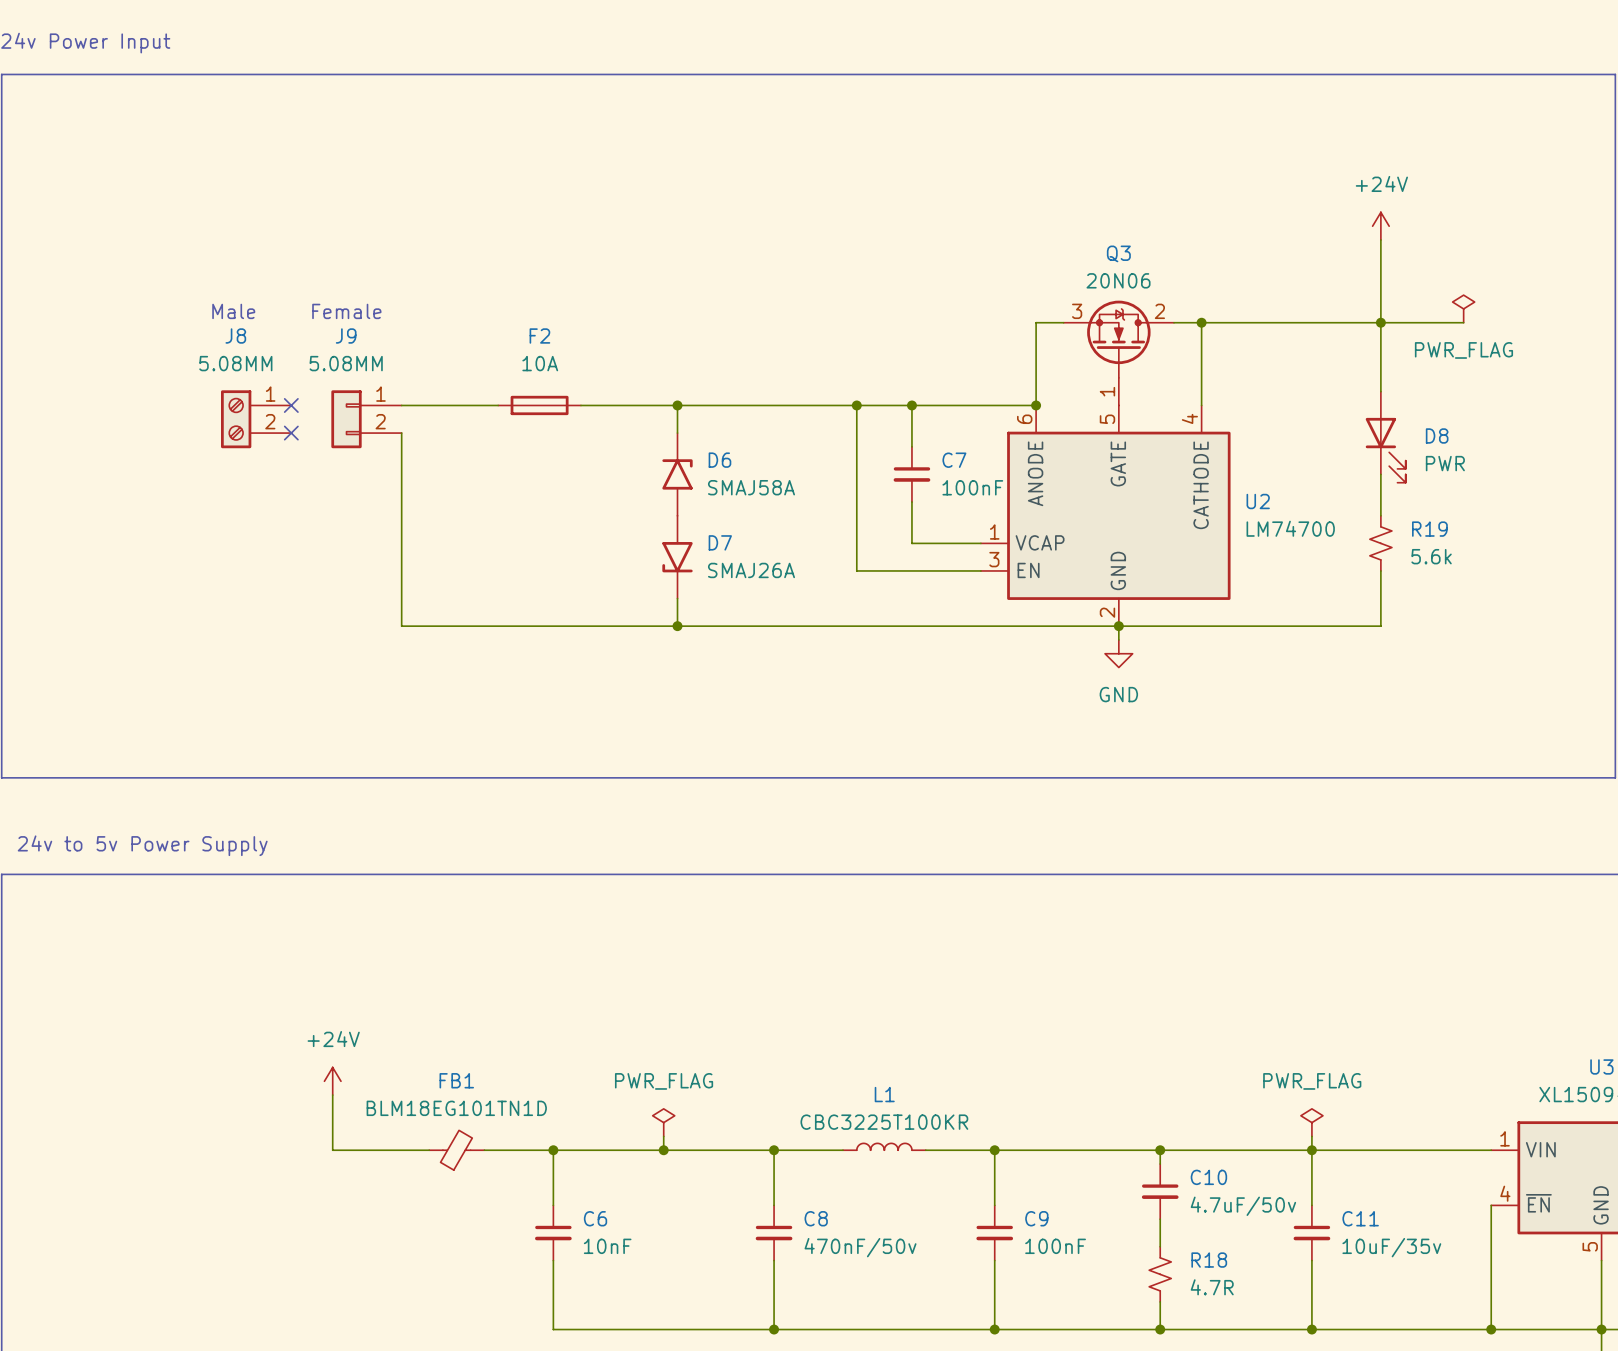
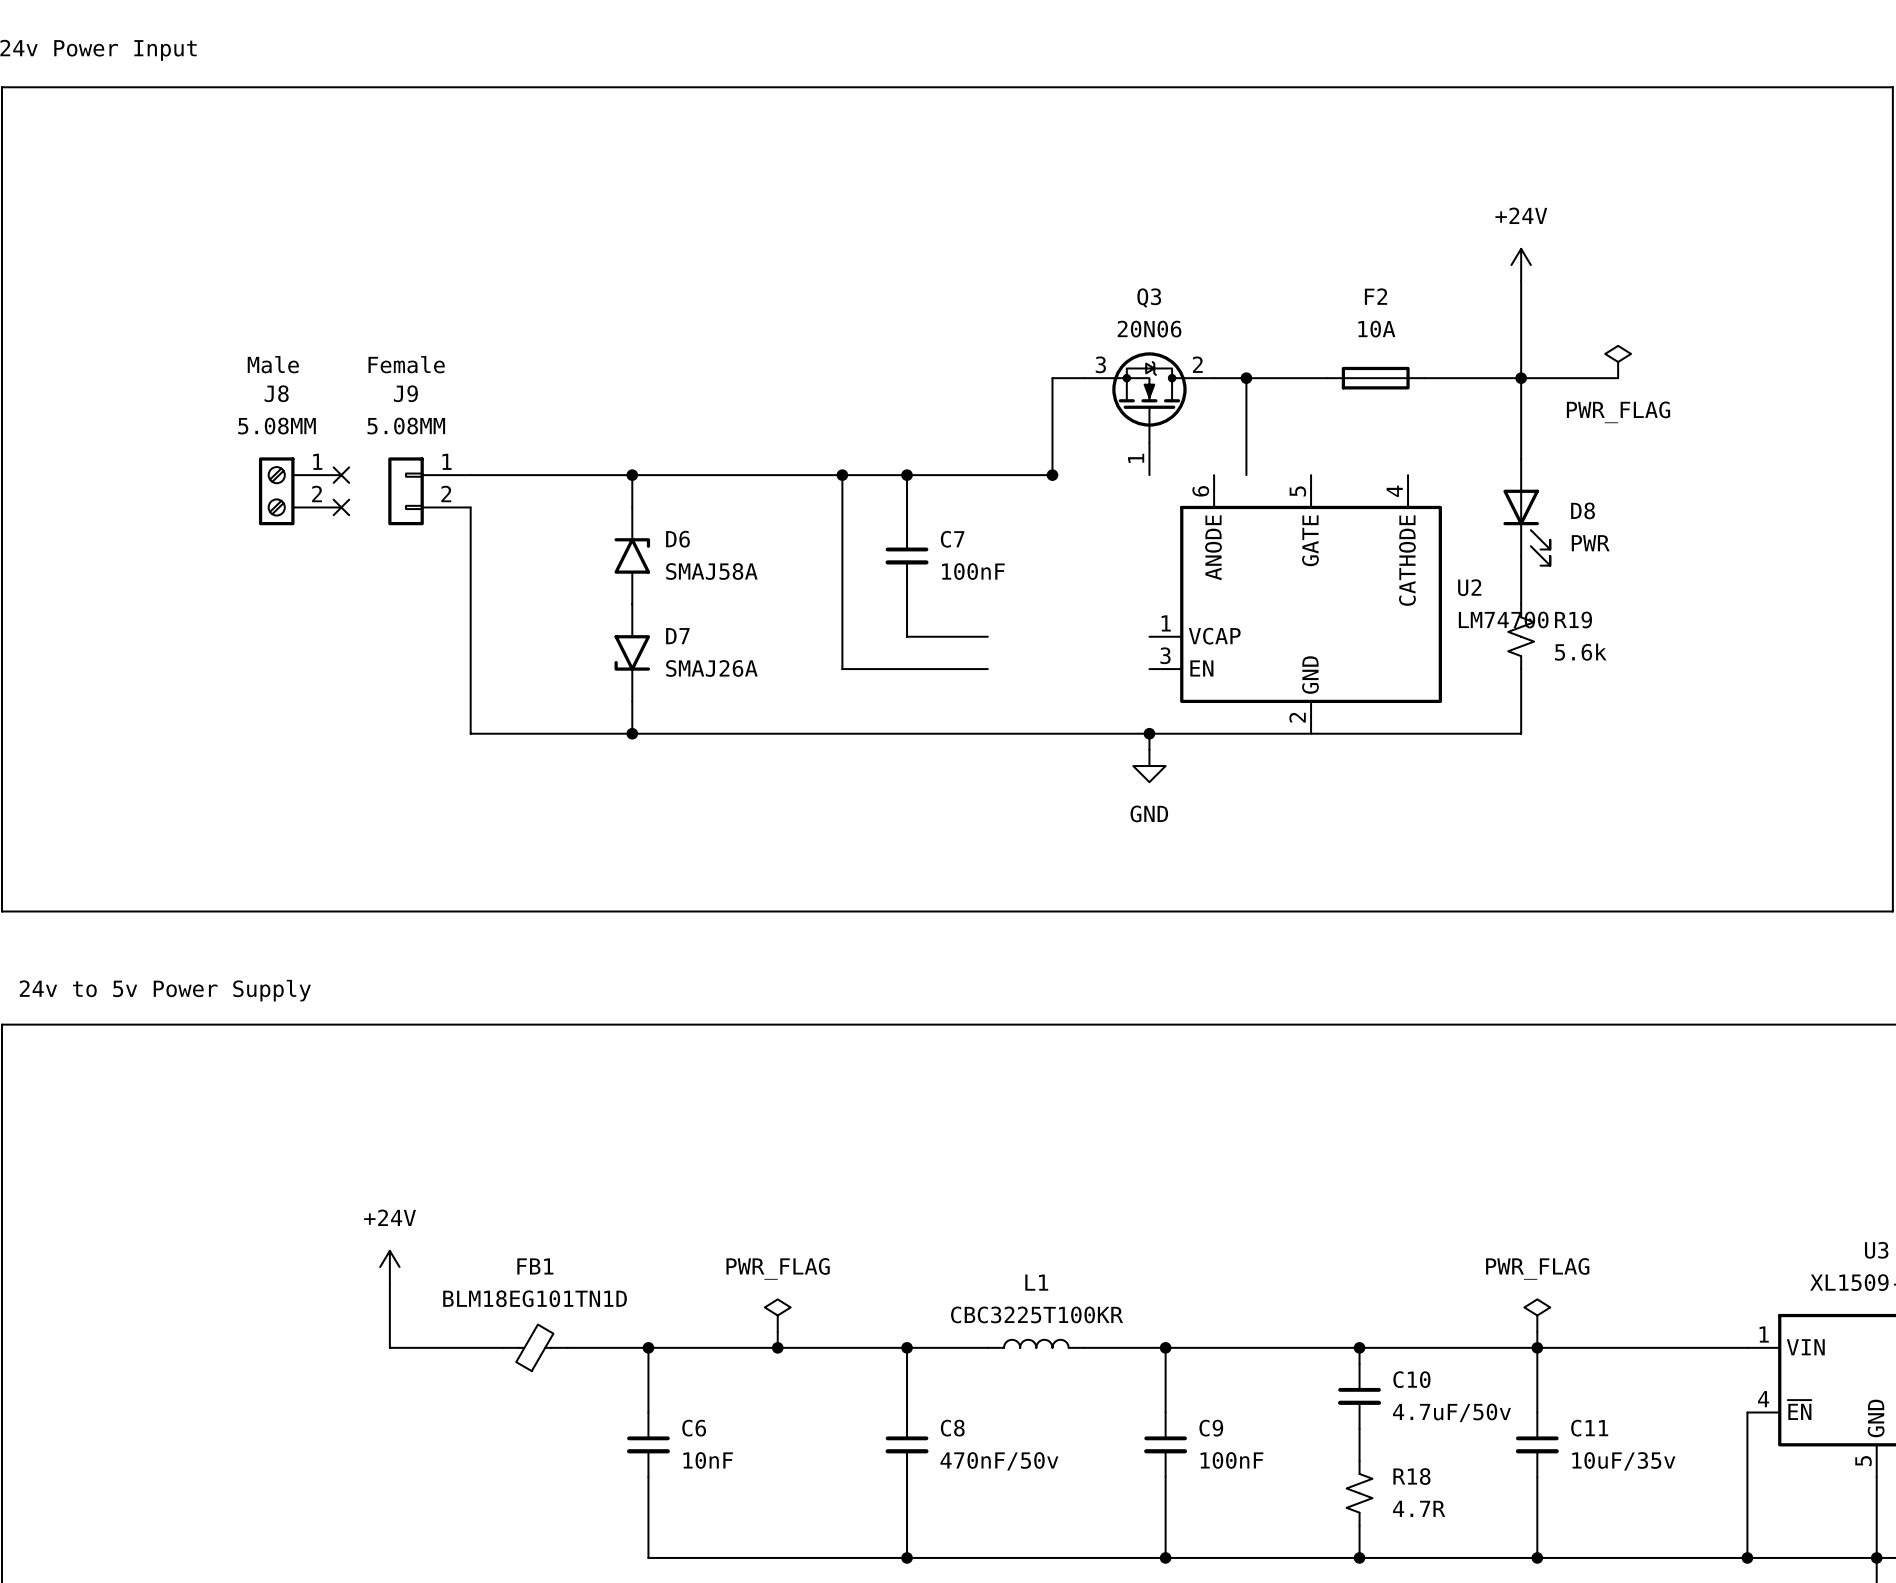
power symbol position: +24V (1380, 226) -> +24V (1521, 265)
wire: (1380, 239) (1380, 391) -> (1521, 281) (1521, 458)
power symbol position: PWR_FLAG (1463, 308) -> PWR_FLAG (1618, 362)
wire: (1036, 322) (1036, 405) (898, 405) -> (1084, 378) (1052, 378) (1052, 475)
junction: none -> (1246, 378)
wire: none -> (1327, 378) (1246, 378) (1246, 475)
wire: (1201, 322) (1201, 405) -> none
junction: (1201, 322) -> none
junction: none -> (1521, 378)
wire: (1380, 322) (1463, 322) -> none
junction: (1380, 322) -> none
Q3 position: (1118, 353) -> (1149, 413)
junction: none -> (632, 475)
F2 position: (539, 405) -> (1375, 378)
wire: (677, 405) (677, 433) -> (632, 475) (632, 507)
junction position: (677, 405) -> (842, 475)
junction: none -> (907, 475)
wire: (856, 405) (856, 570) (980, 570) -> (842, 475) (842, 669) (987, 669)
junction: (856, 405) -> none
wire: (911, 405) (911, 446) -> (907, 475) (907, 523)
junction position: (911, 405) -> (1052, 475)
junction: (1036, 405) -> none
D8 position: (1385, 437) -> (1526, 512)
D6 position: (677, 474) -> (632, 555)
C7 position: (911, 474) -> (907, 555)
wire: (1380, 474) (1380, 515) -> (1521, 555) (1521, 604)
wire: (911, 502) (911, 543) (980, 543) -> (907, 588) (907, 636) (987, 636)
R19 position: (1380, 543) -> (1521, 636)
D7 position: (677, 557) -> (632, 652)
wire: (1380, 570) (1380, 626) (1298, 626) -> (1521, 669) (1521, 733)
wire: (677, 598) (677, 626) -> (632, 701) (632, 733)
junction: none -> (632, 733)
junction: (677, 626) -> none
junction: none -> (1149, 733)
wire: (1118, 626) (1118, 639) -> (1149, 733) (1149, 749)
junction: (1118, 626) -> none
power symbol position: GND (1118, 653) -> GND (1149, 766)

